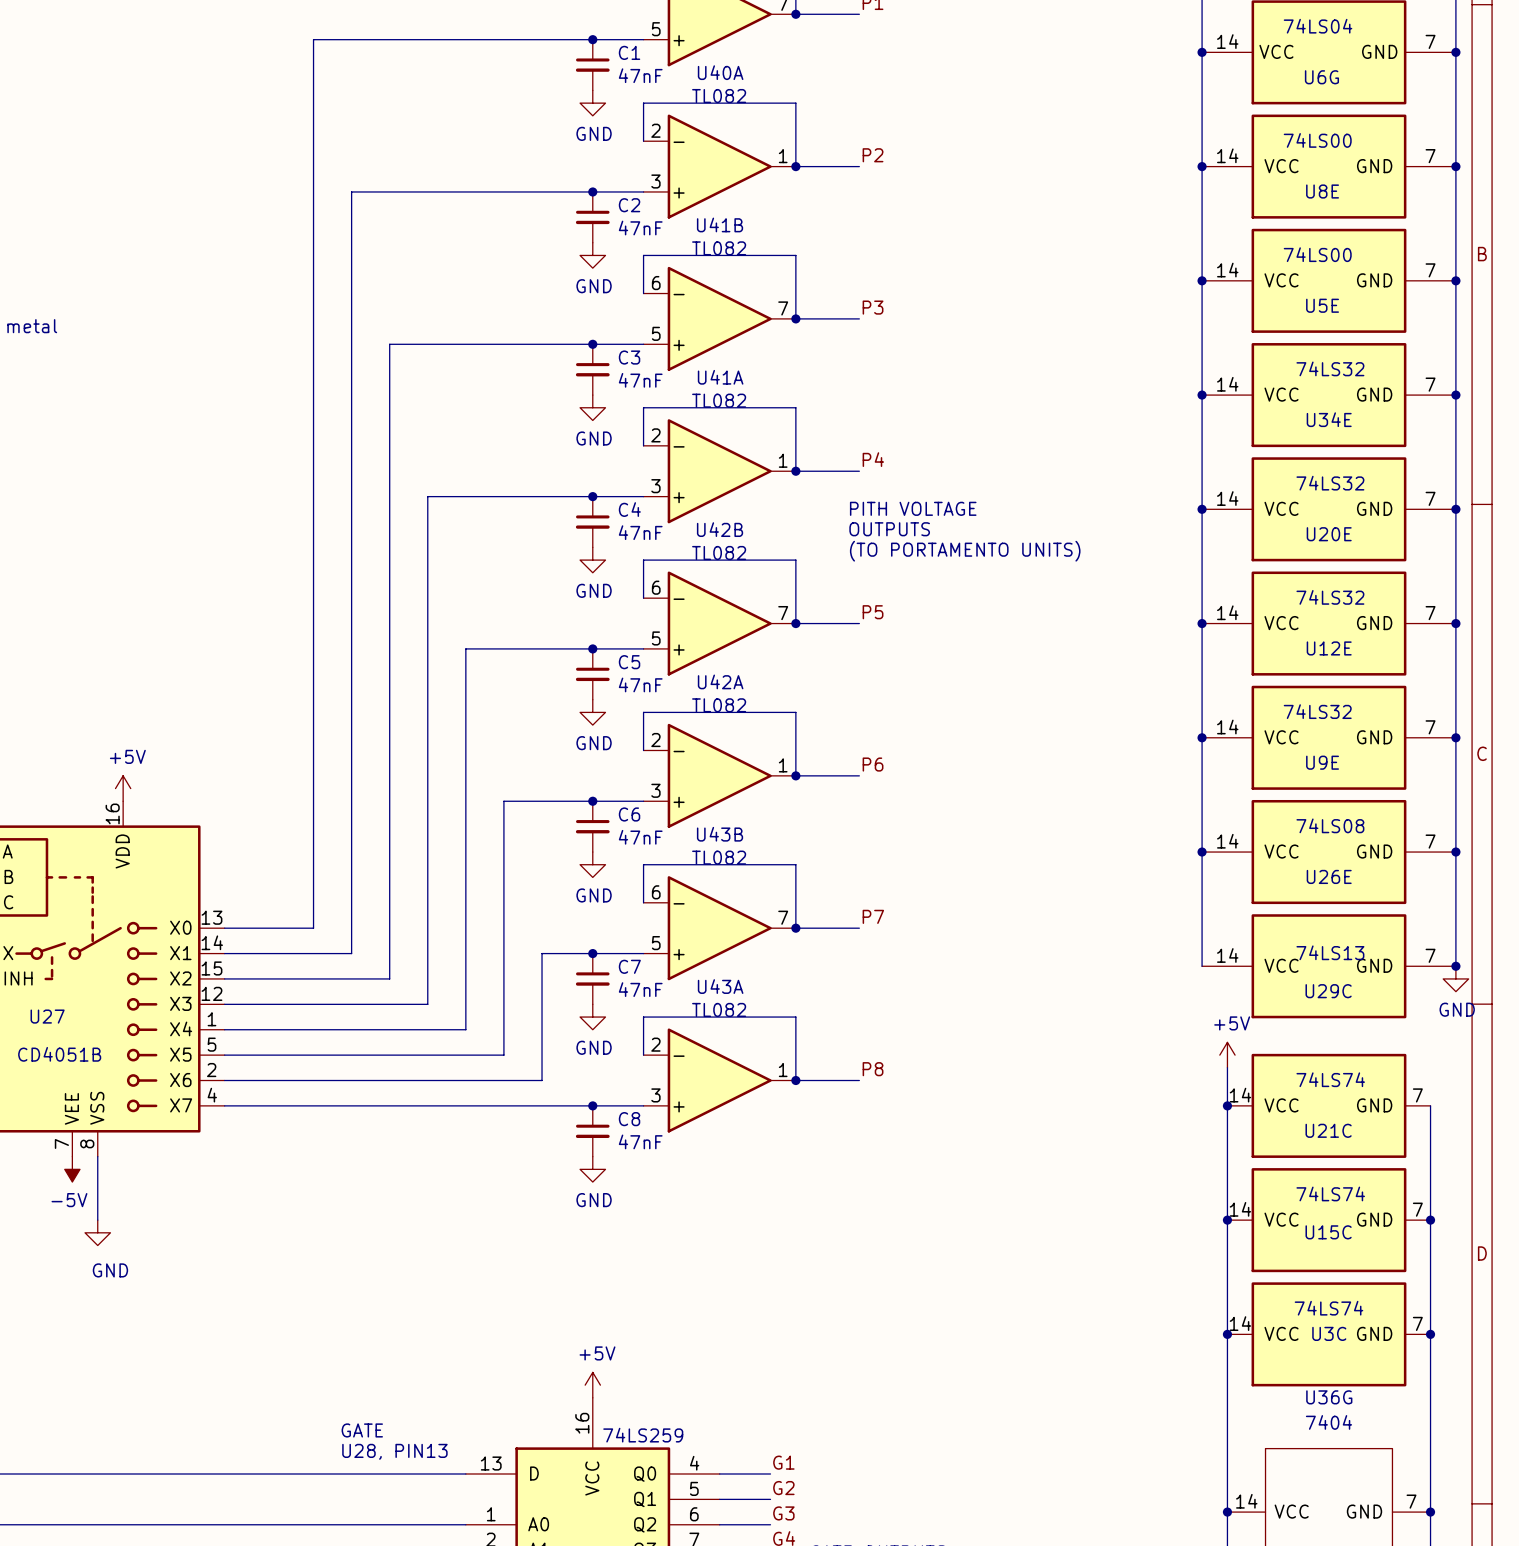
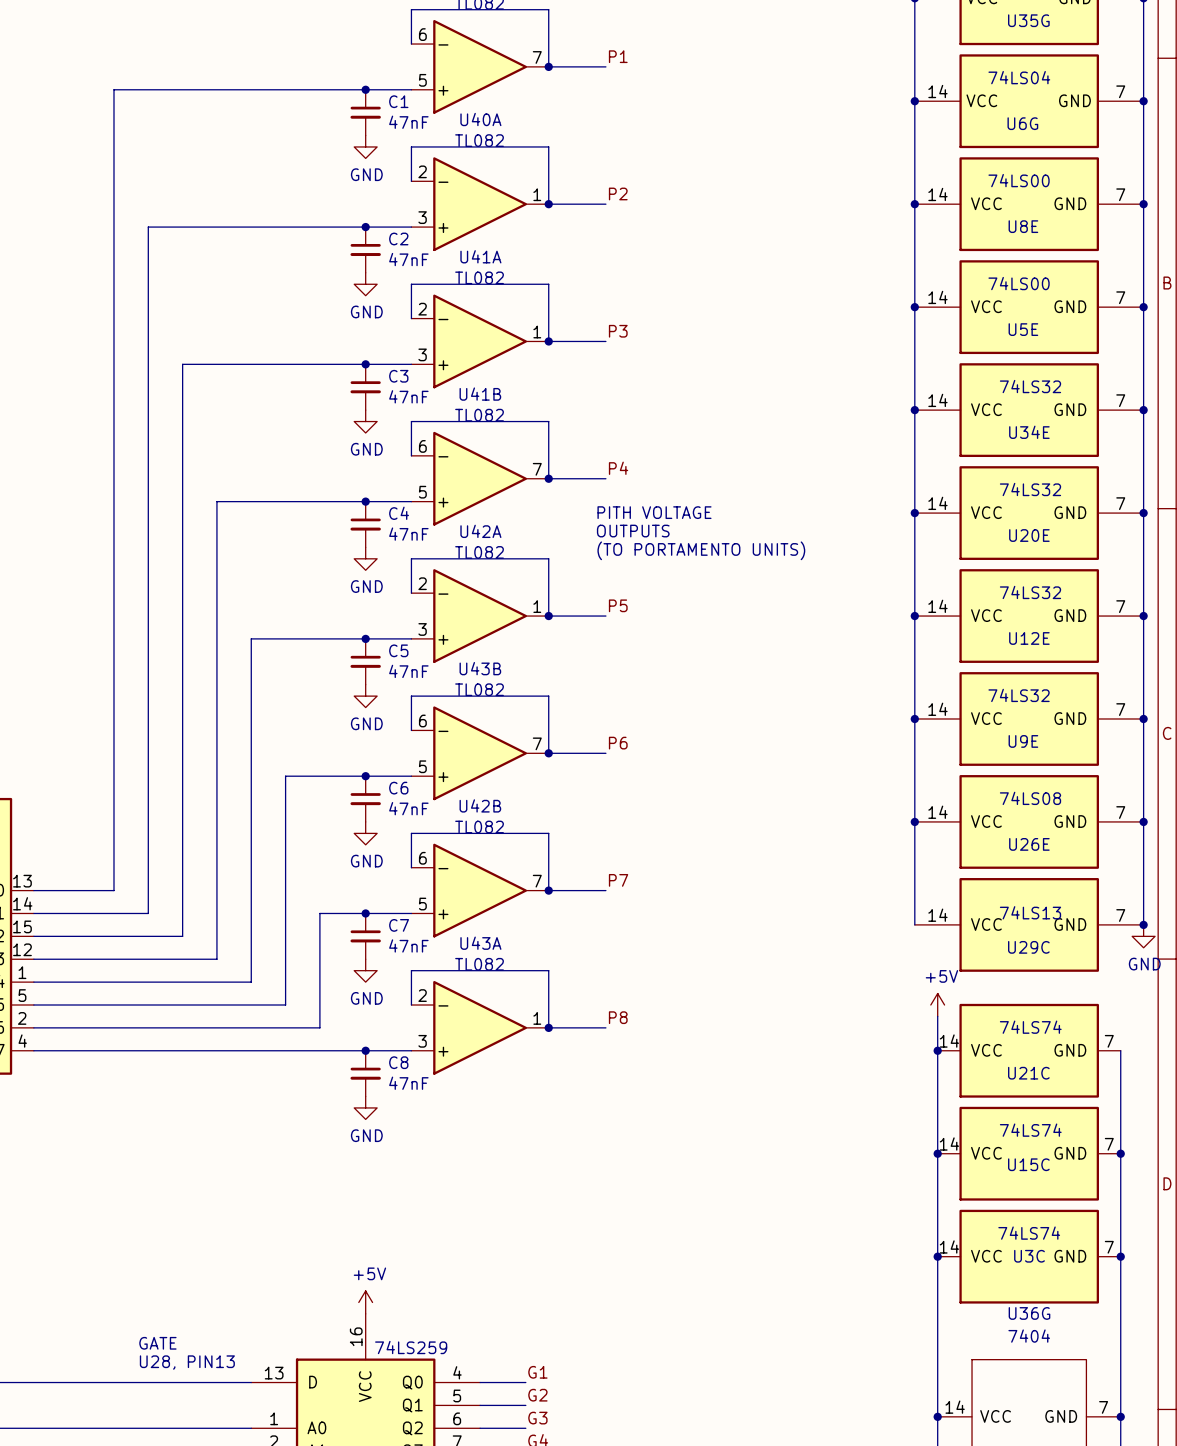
U41B position: (719, 318) -> (480, 478)
U41A position: (719, 471) -> (480, 341)
U42B: TL082 (719, 623) -> none
U42A position: (719, 775) -> (480, 616)
U43B: none -> TL082 (480, 753)
U43B name: U43B (720, 834) -> U42B (480, 805)

